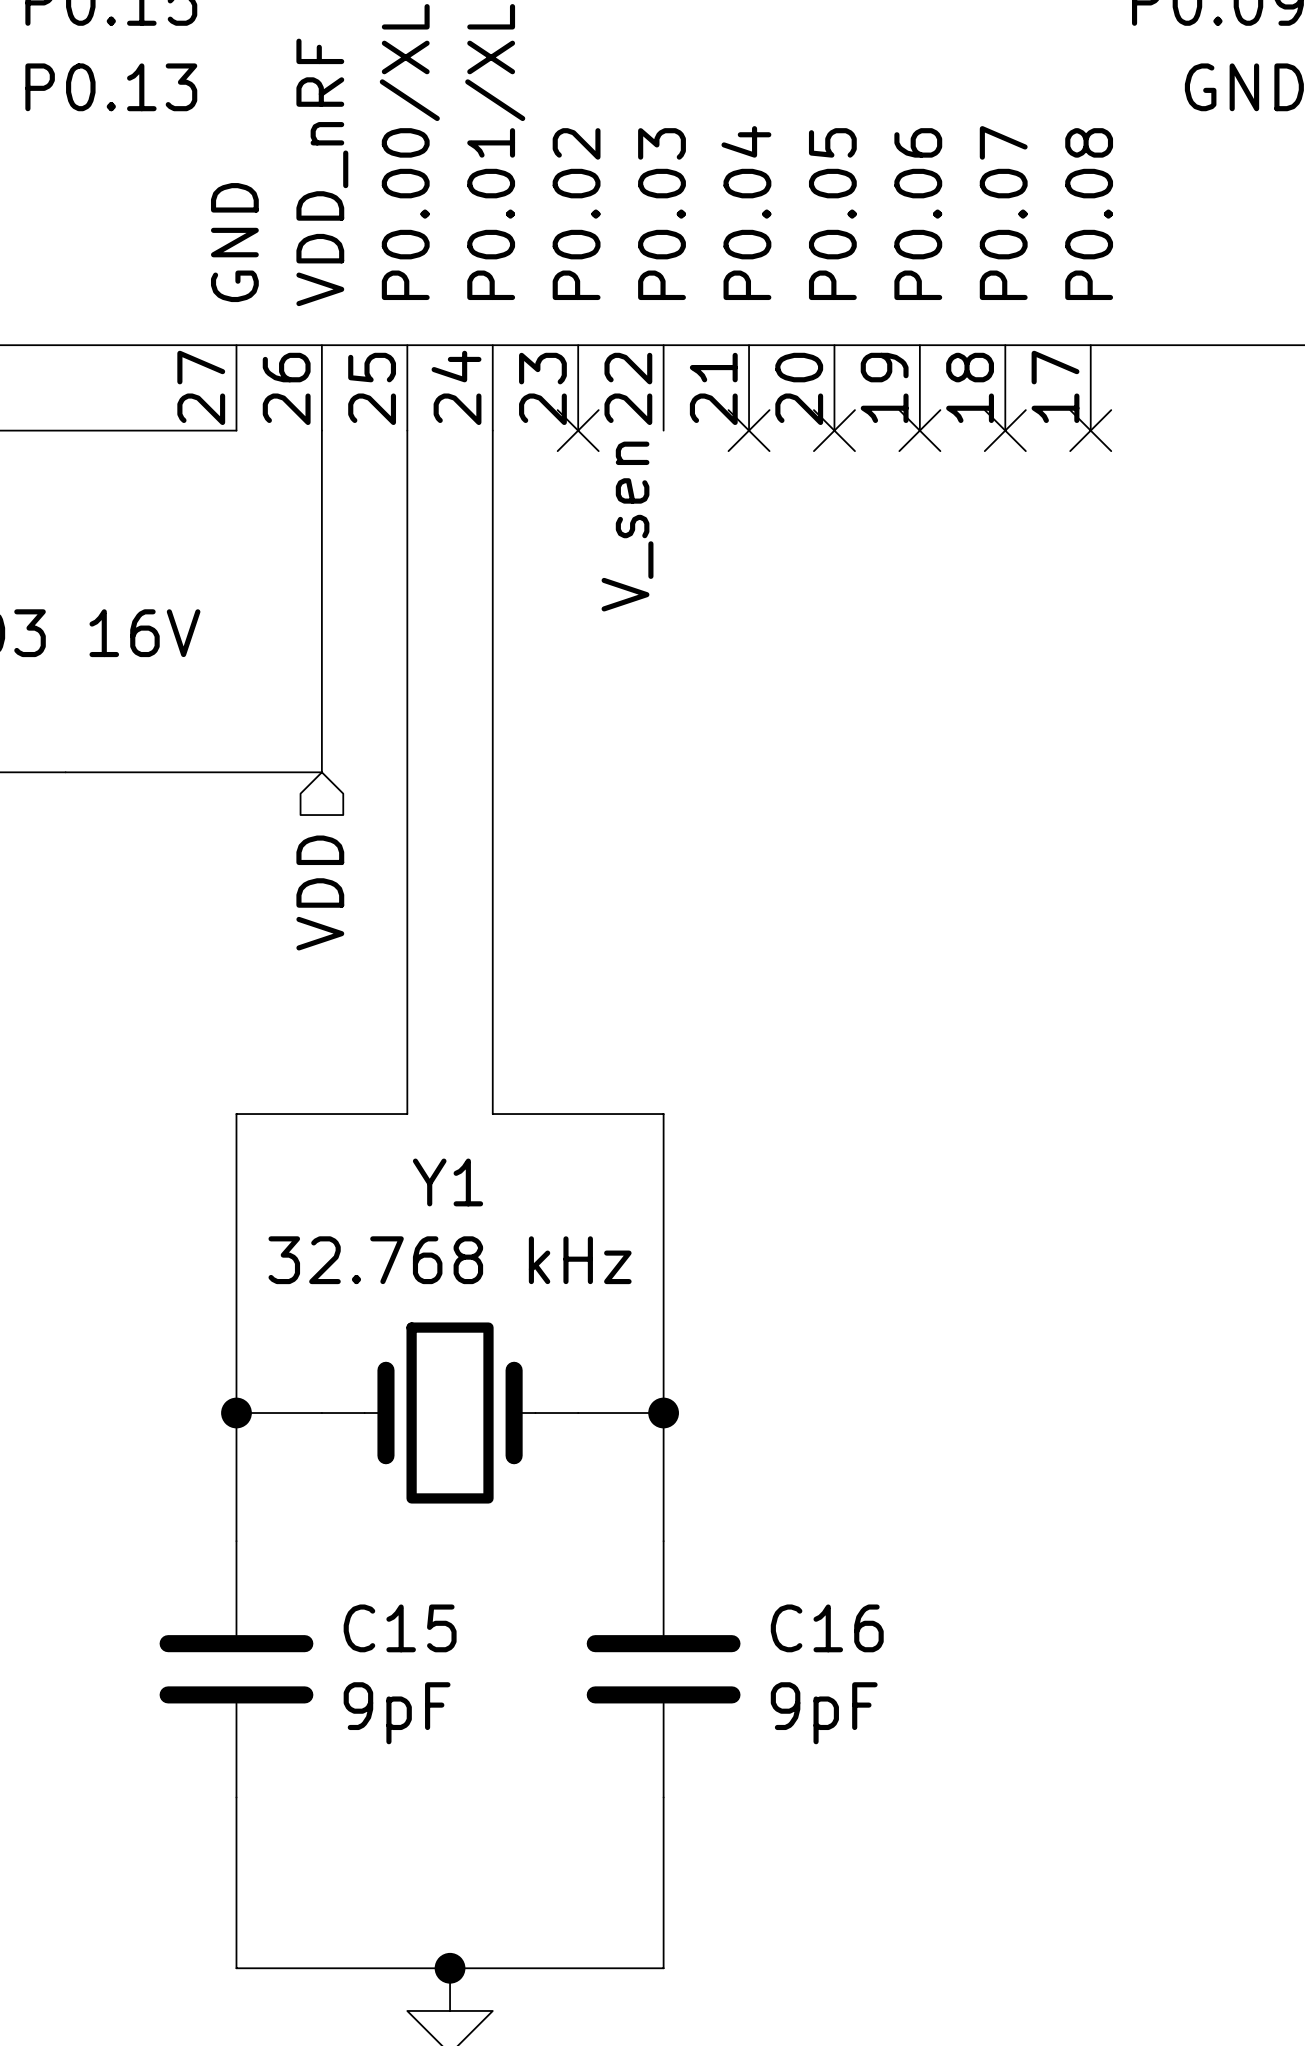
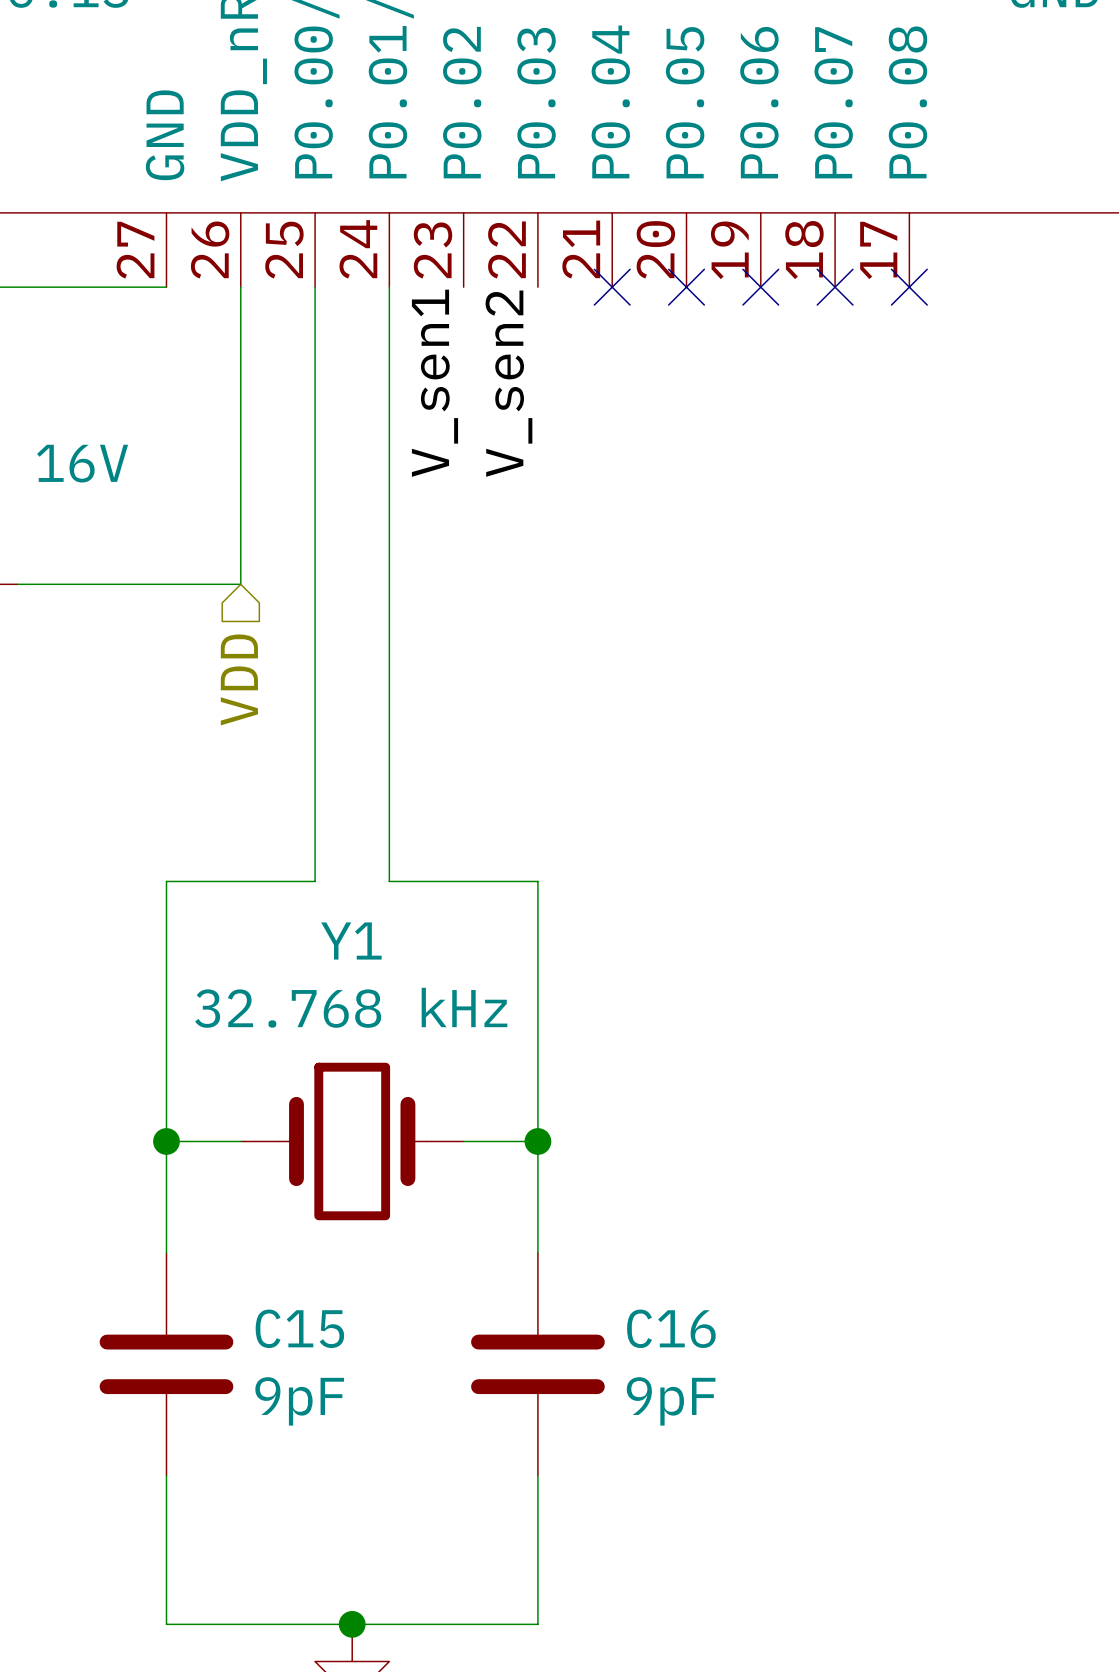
no-connect mark: (578, 430) -> none
label: V_sen (627, 526) -> V_sen2 (508, 383)
label: none -> V_sen1 (434, 383)

